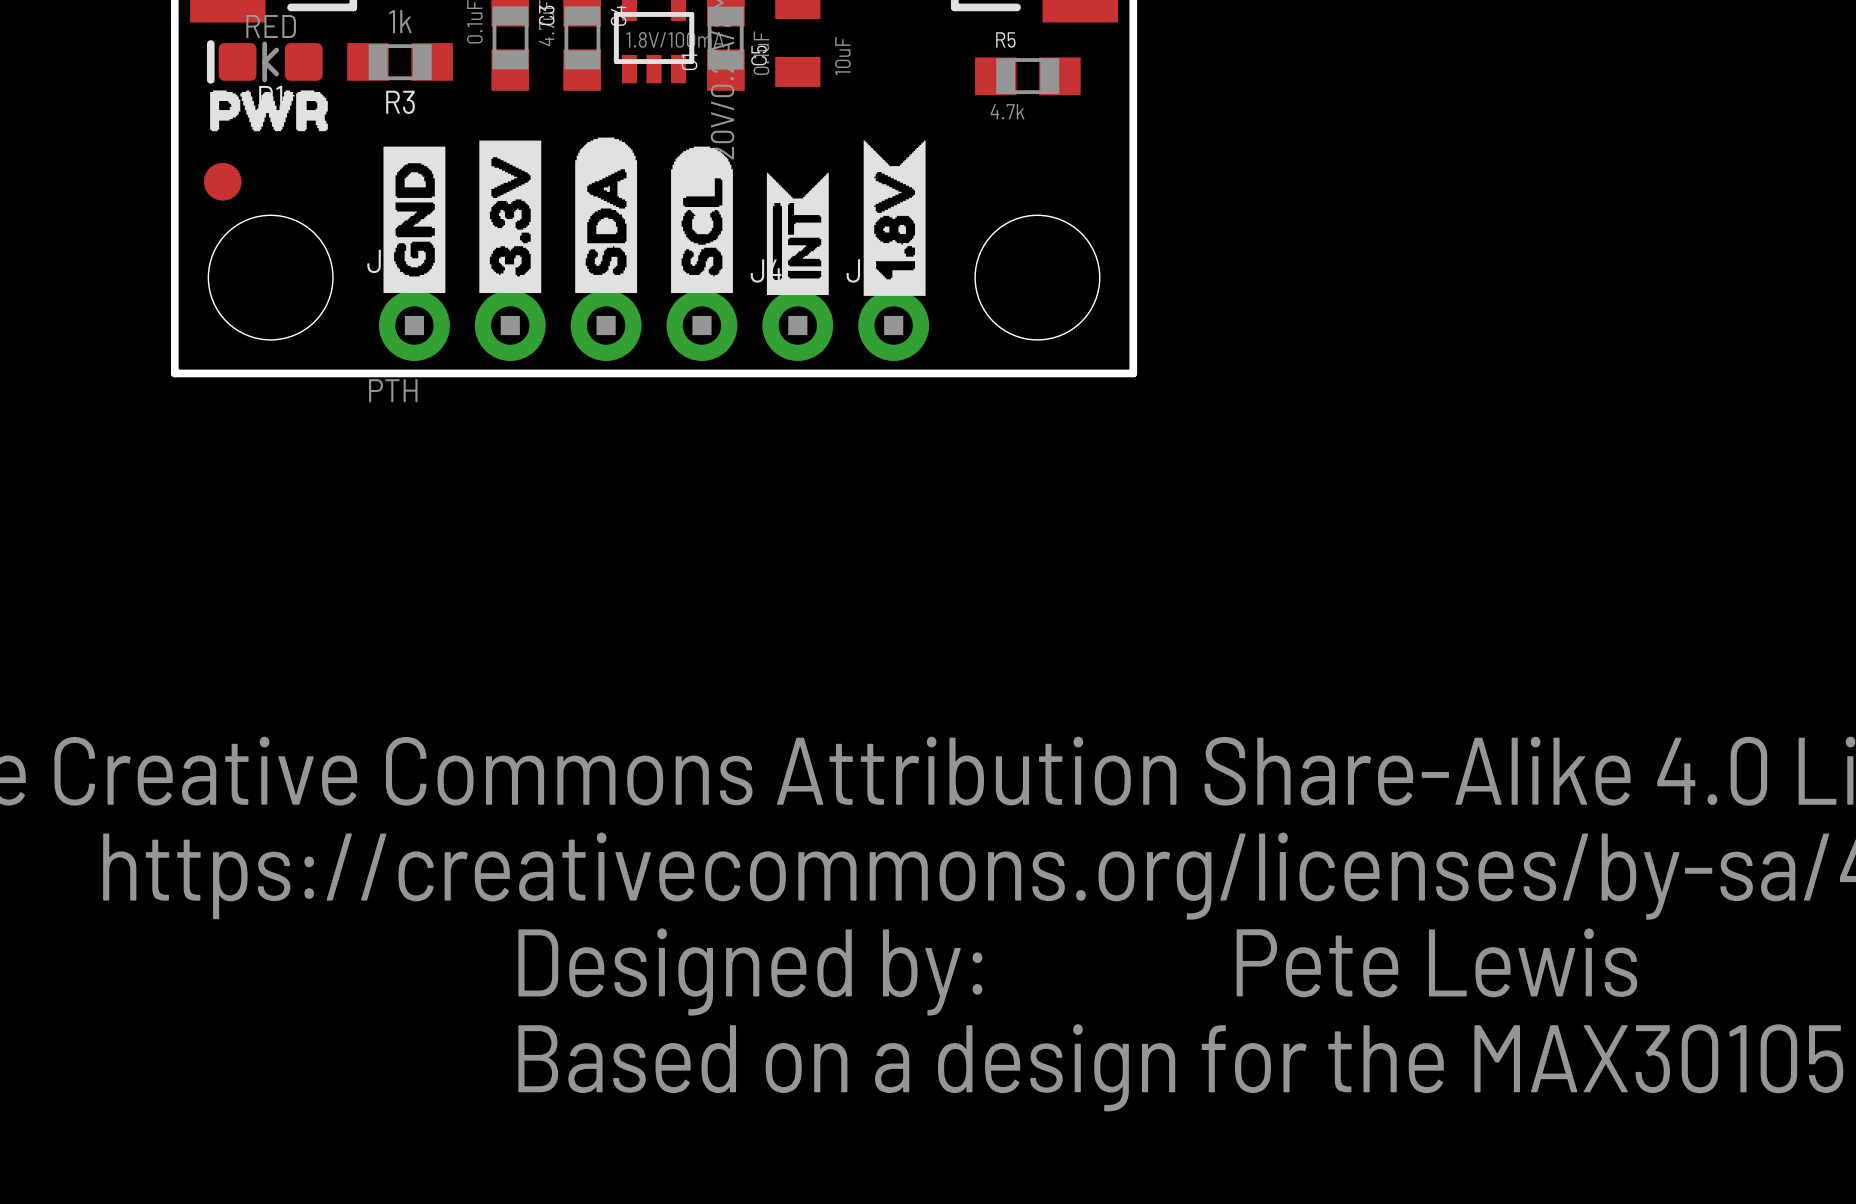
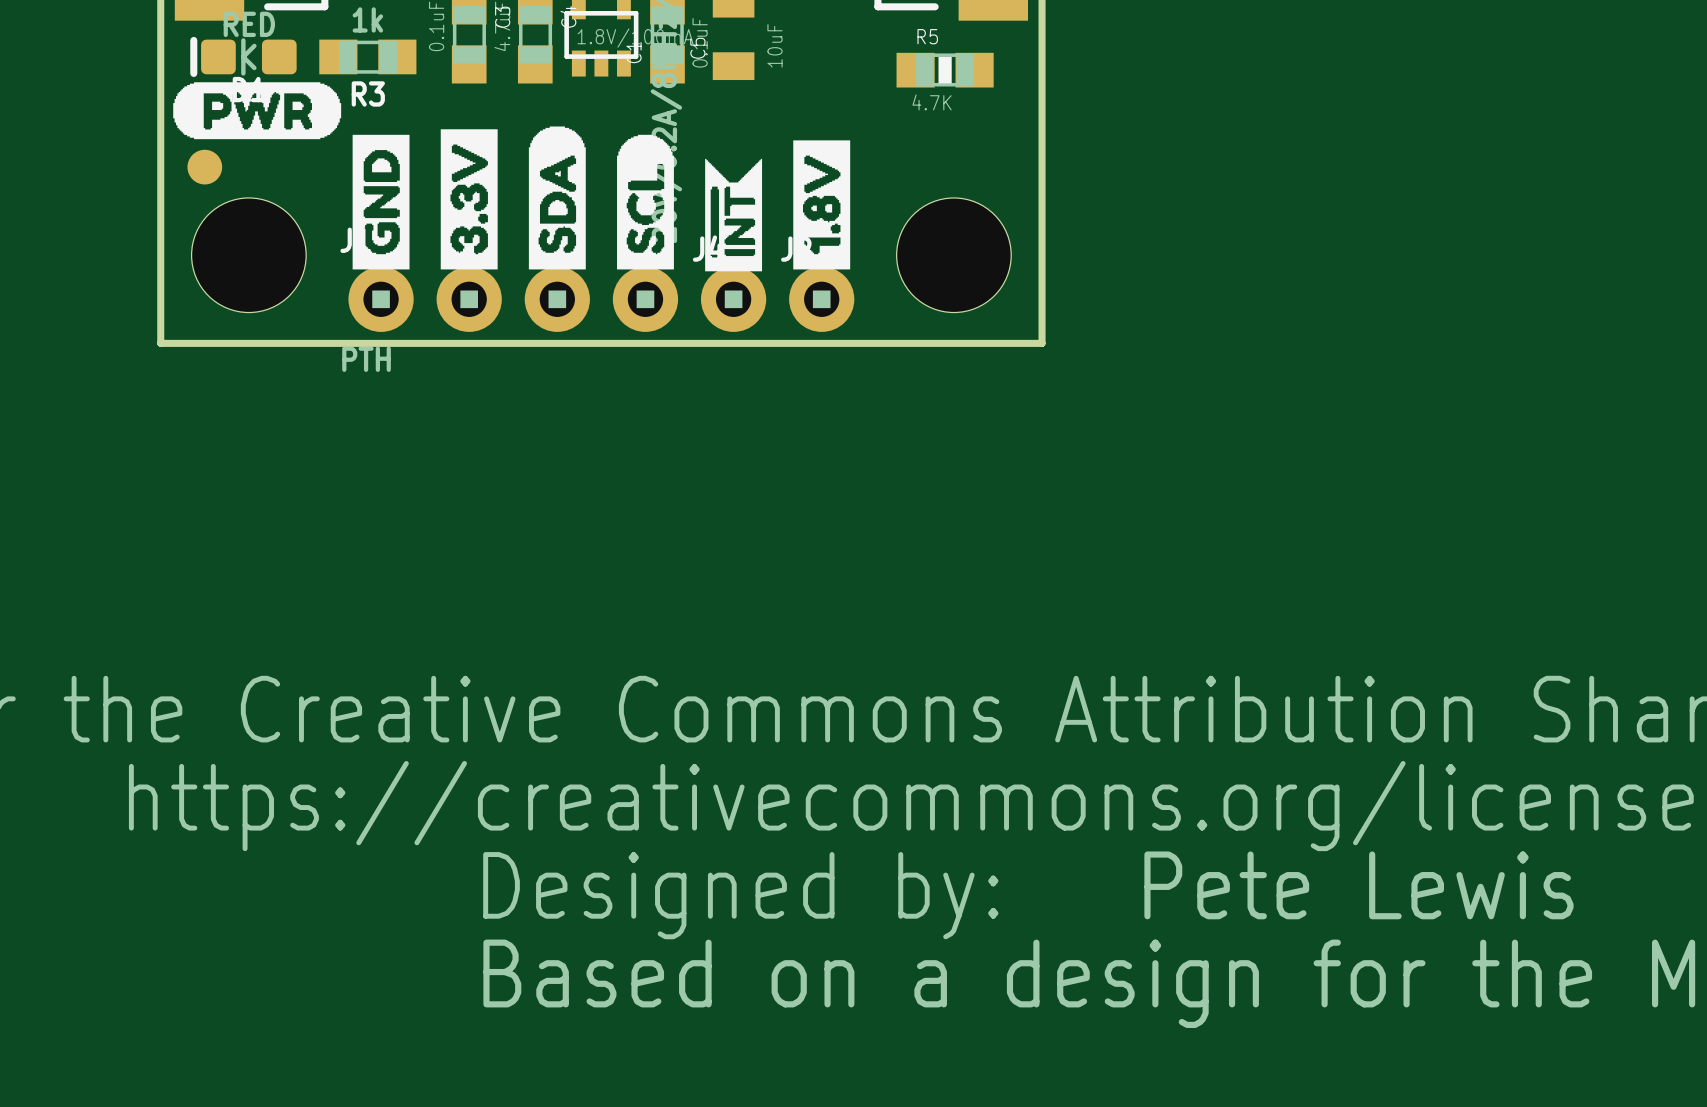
R5 footprint: [975, 57, 1081, 96] -> [896, 52, 994, 88]
drawing shape: [210, 90, 328, 132] -> [173, 82, 342, 140]
R5 value: 4.7k (1007, 111) -> 4.7K (932, 102)
drawing shape: [863, 140, 926, 296] -> [793, 140, 851, 270]

